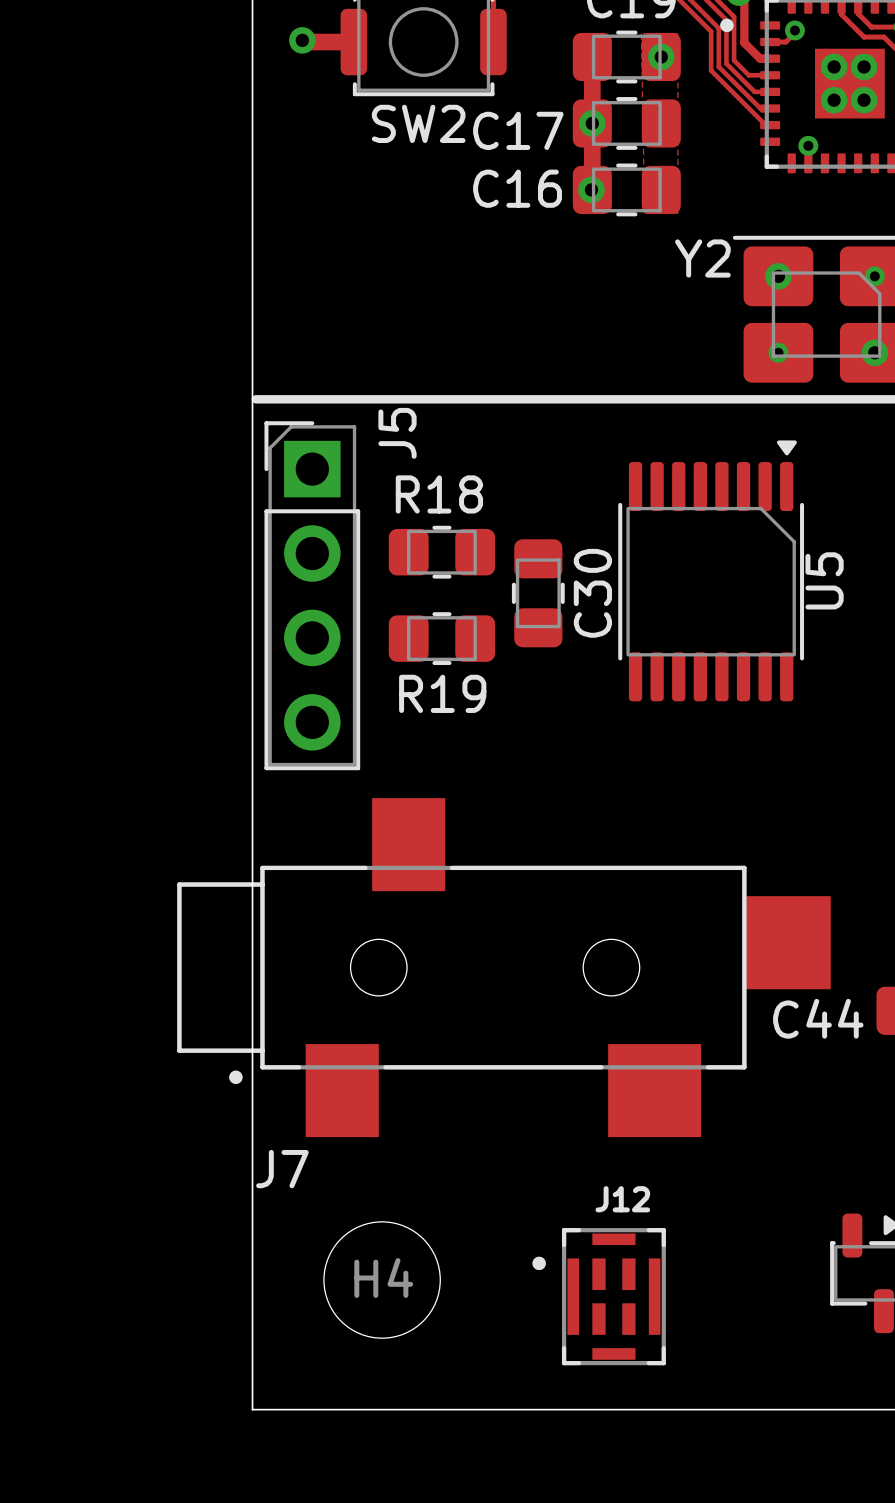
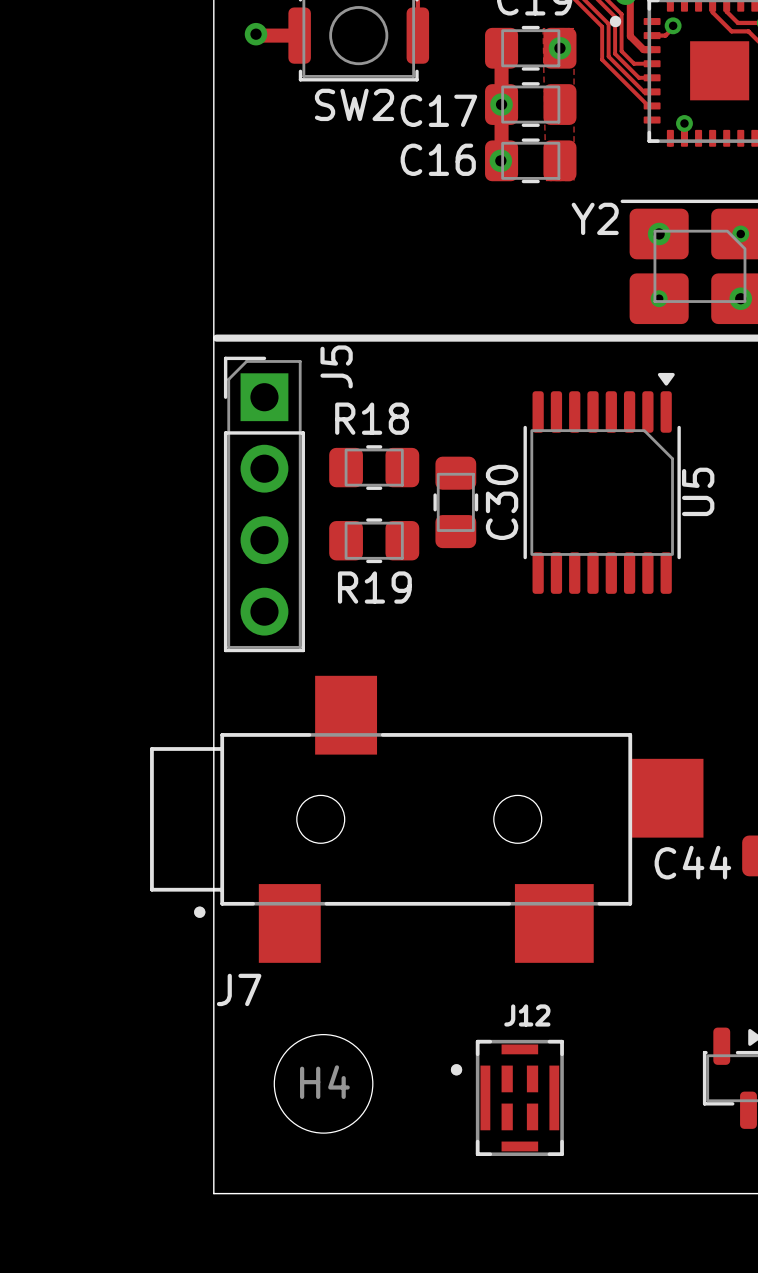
via: (834, 66) -> none
via: (864, 66) -> none
via: (834, 100) -> none
via: (864, 100) -> none

